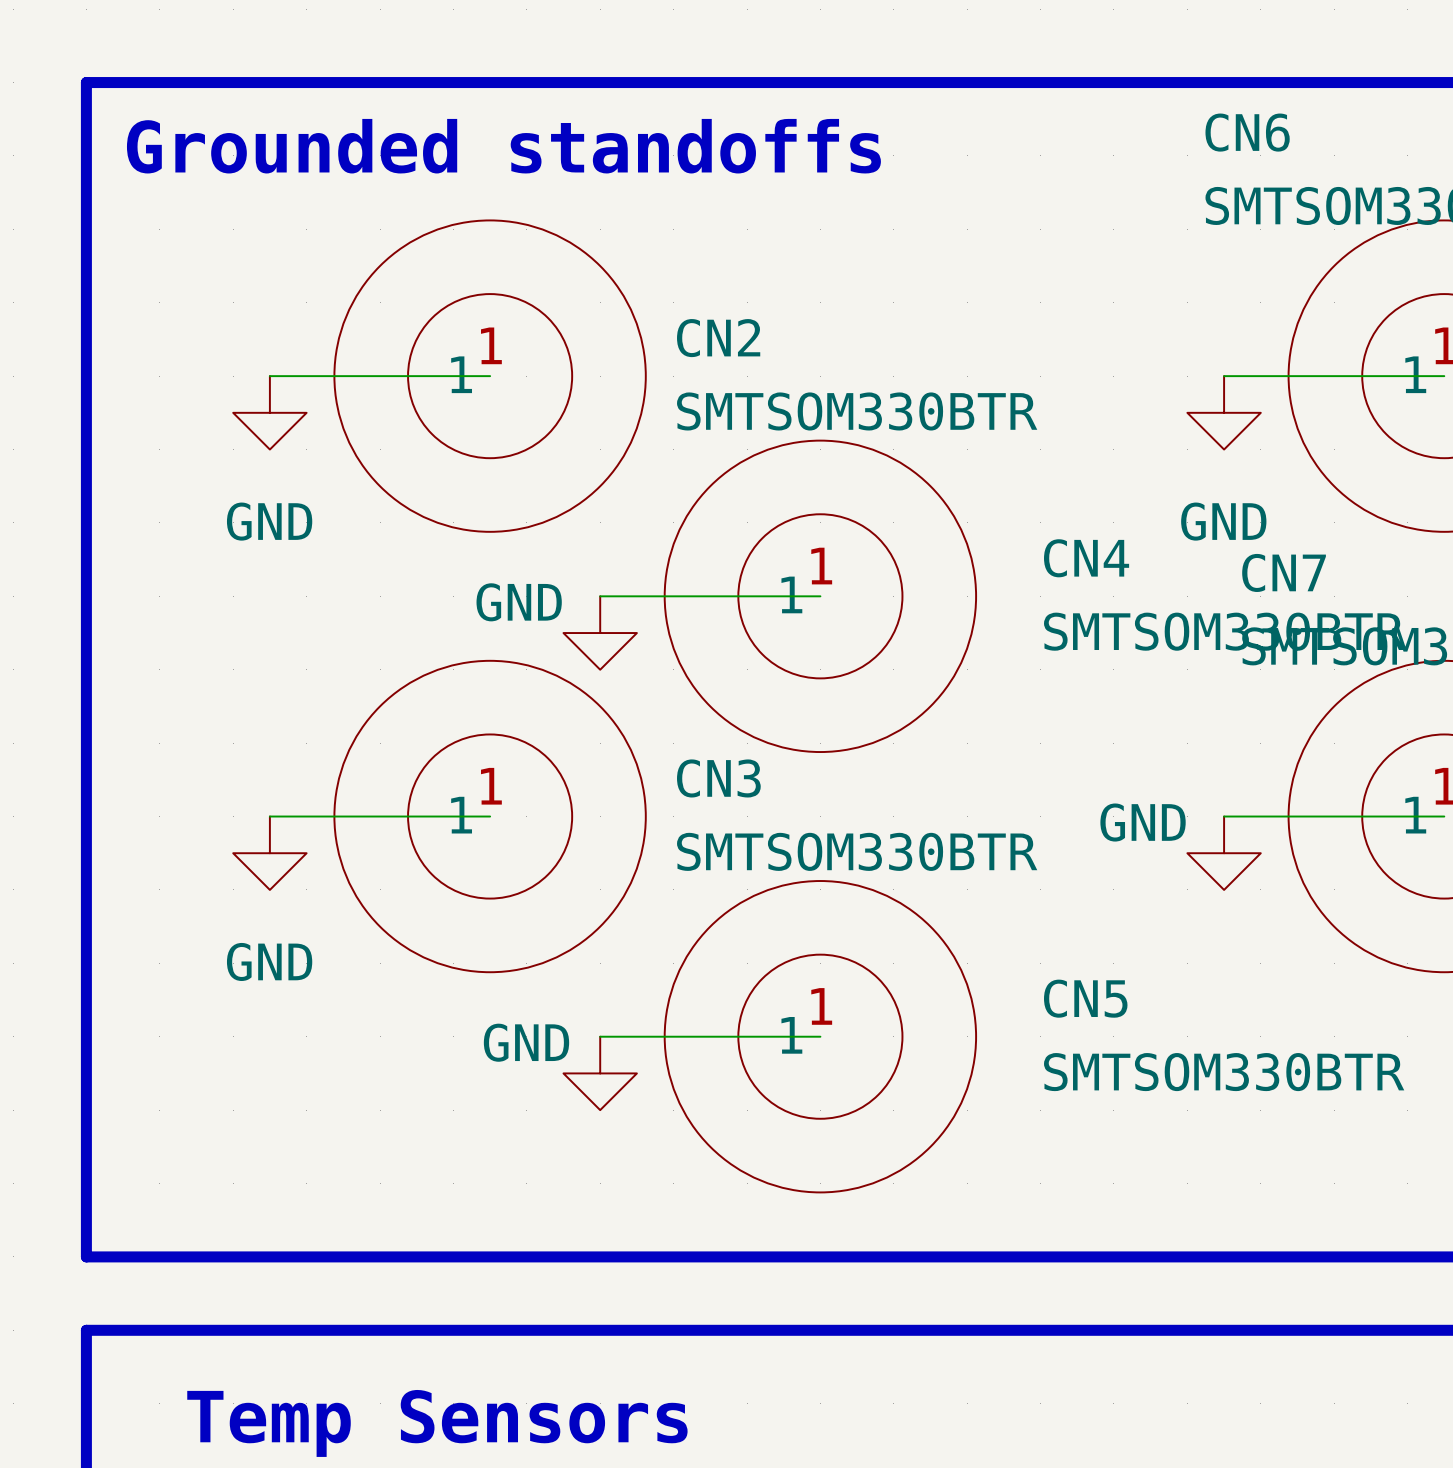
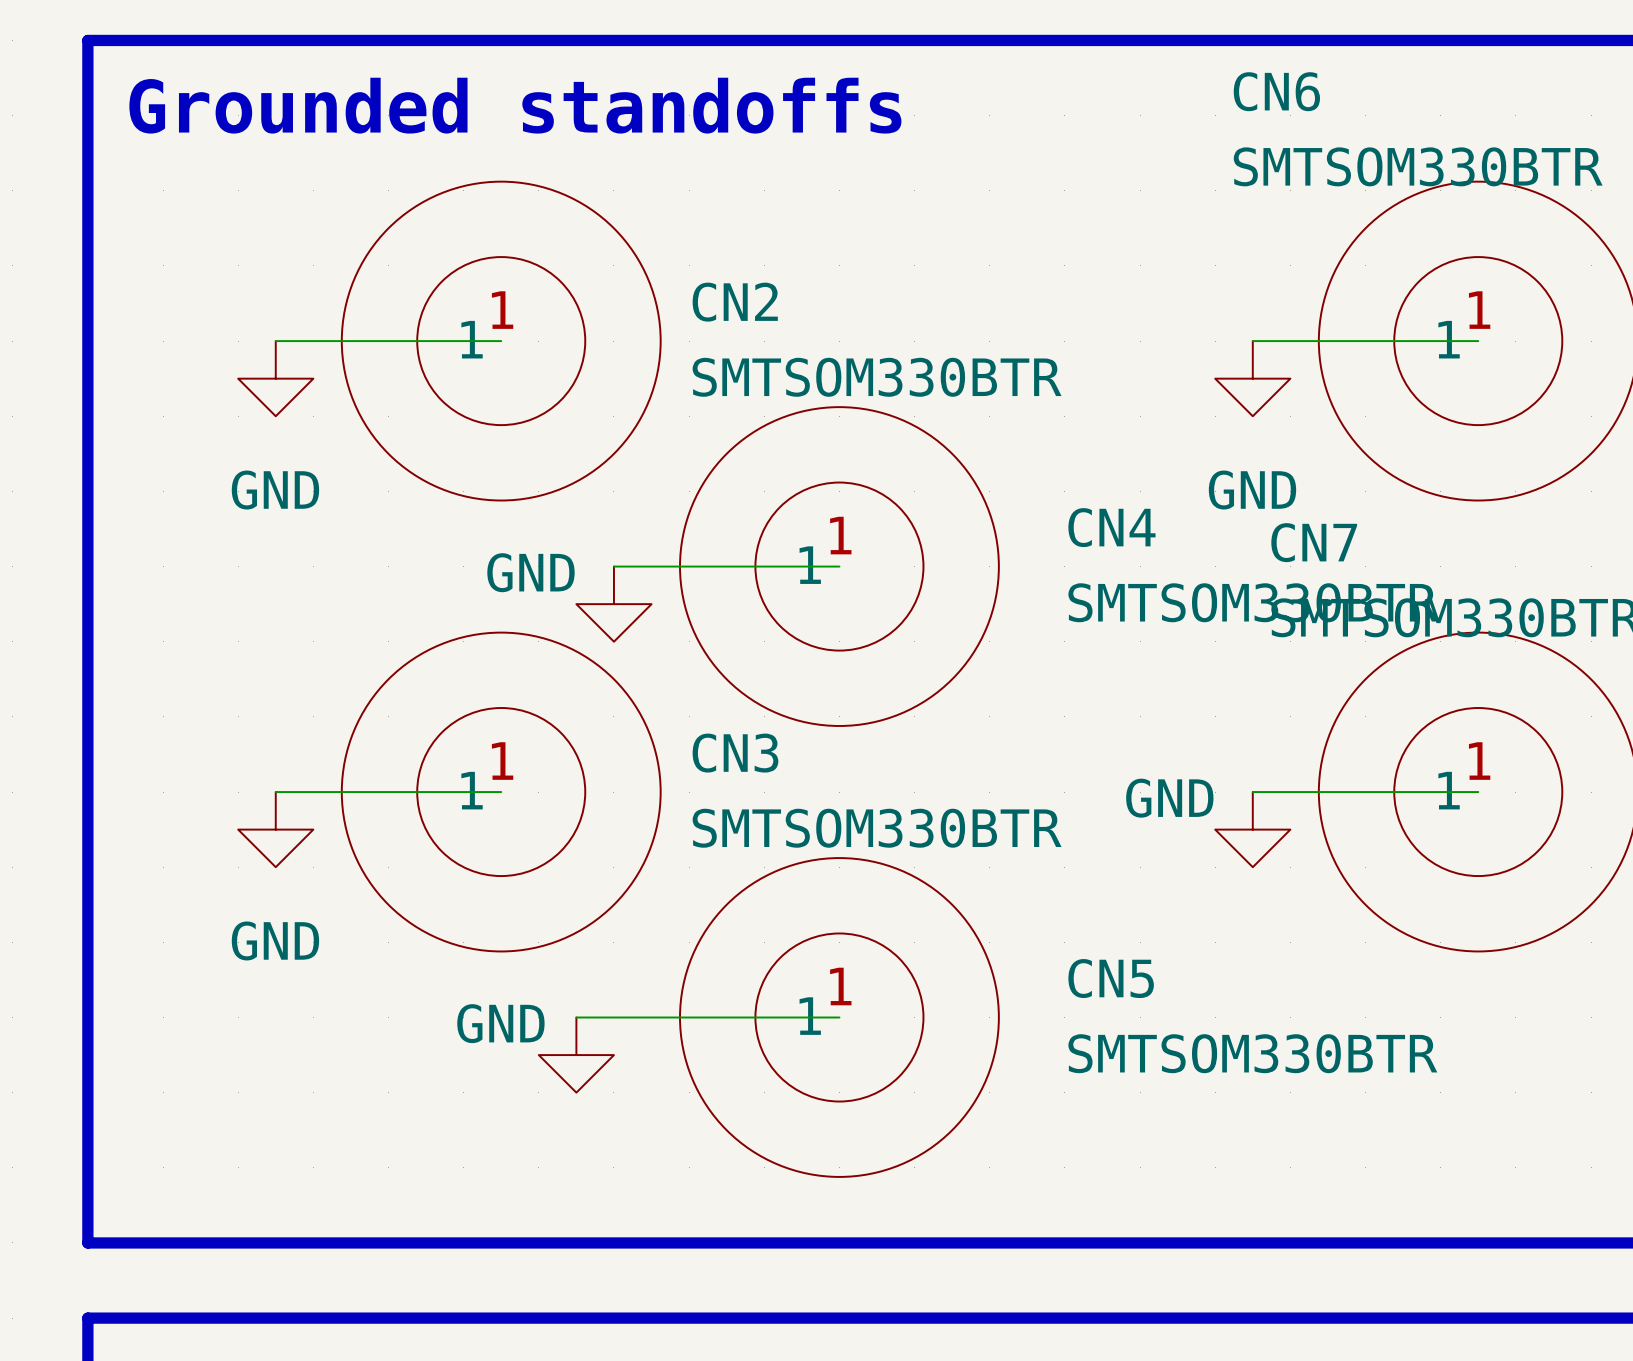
wire: none -> (576, 1017) (613, 1017)
power symbol position: GND (600, 1073) -> GND (576, 1055)

